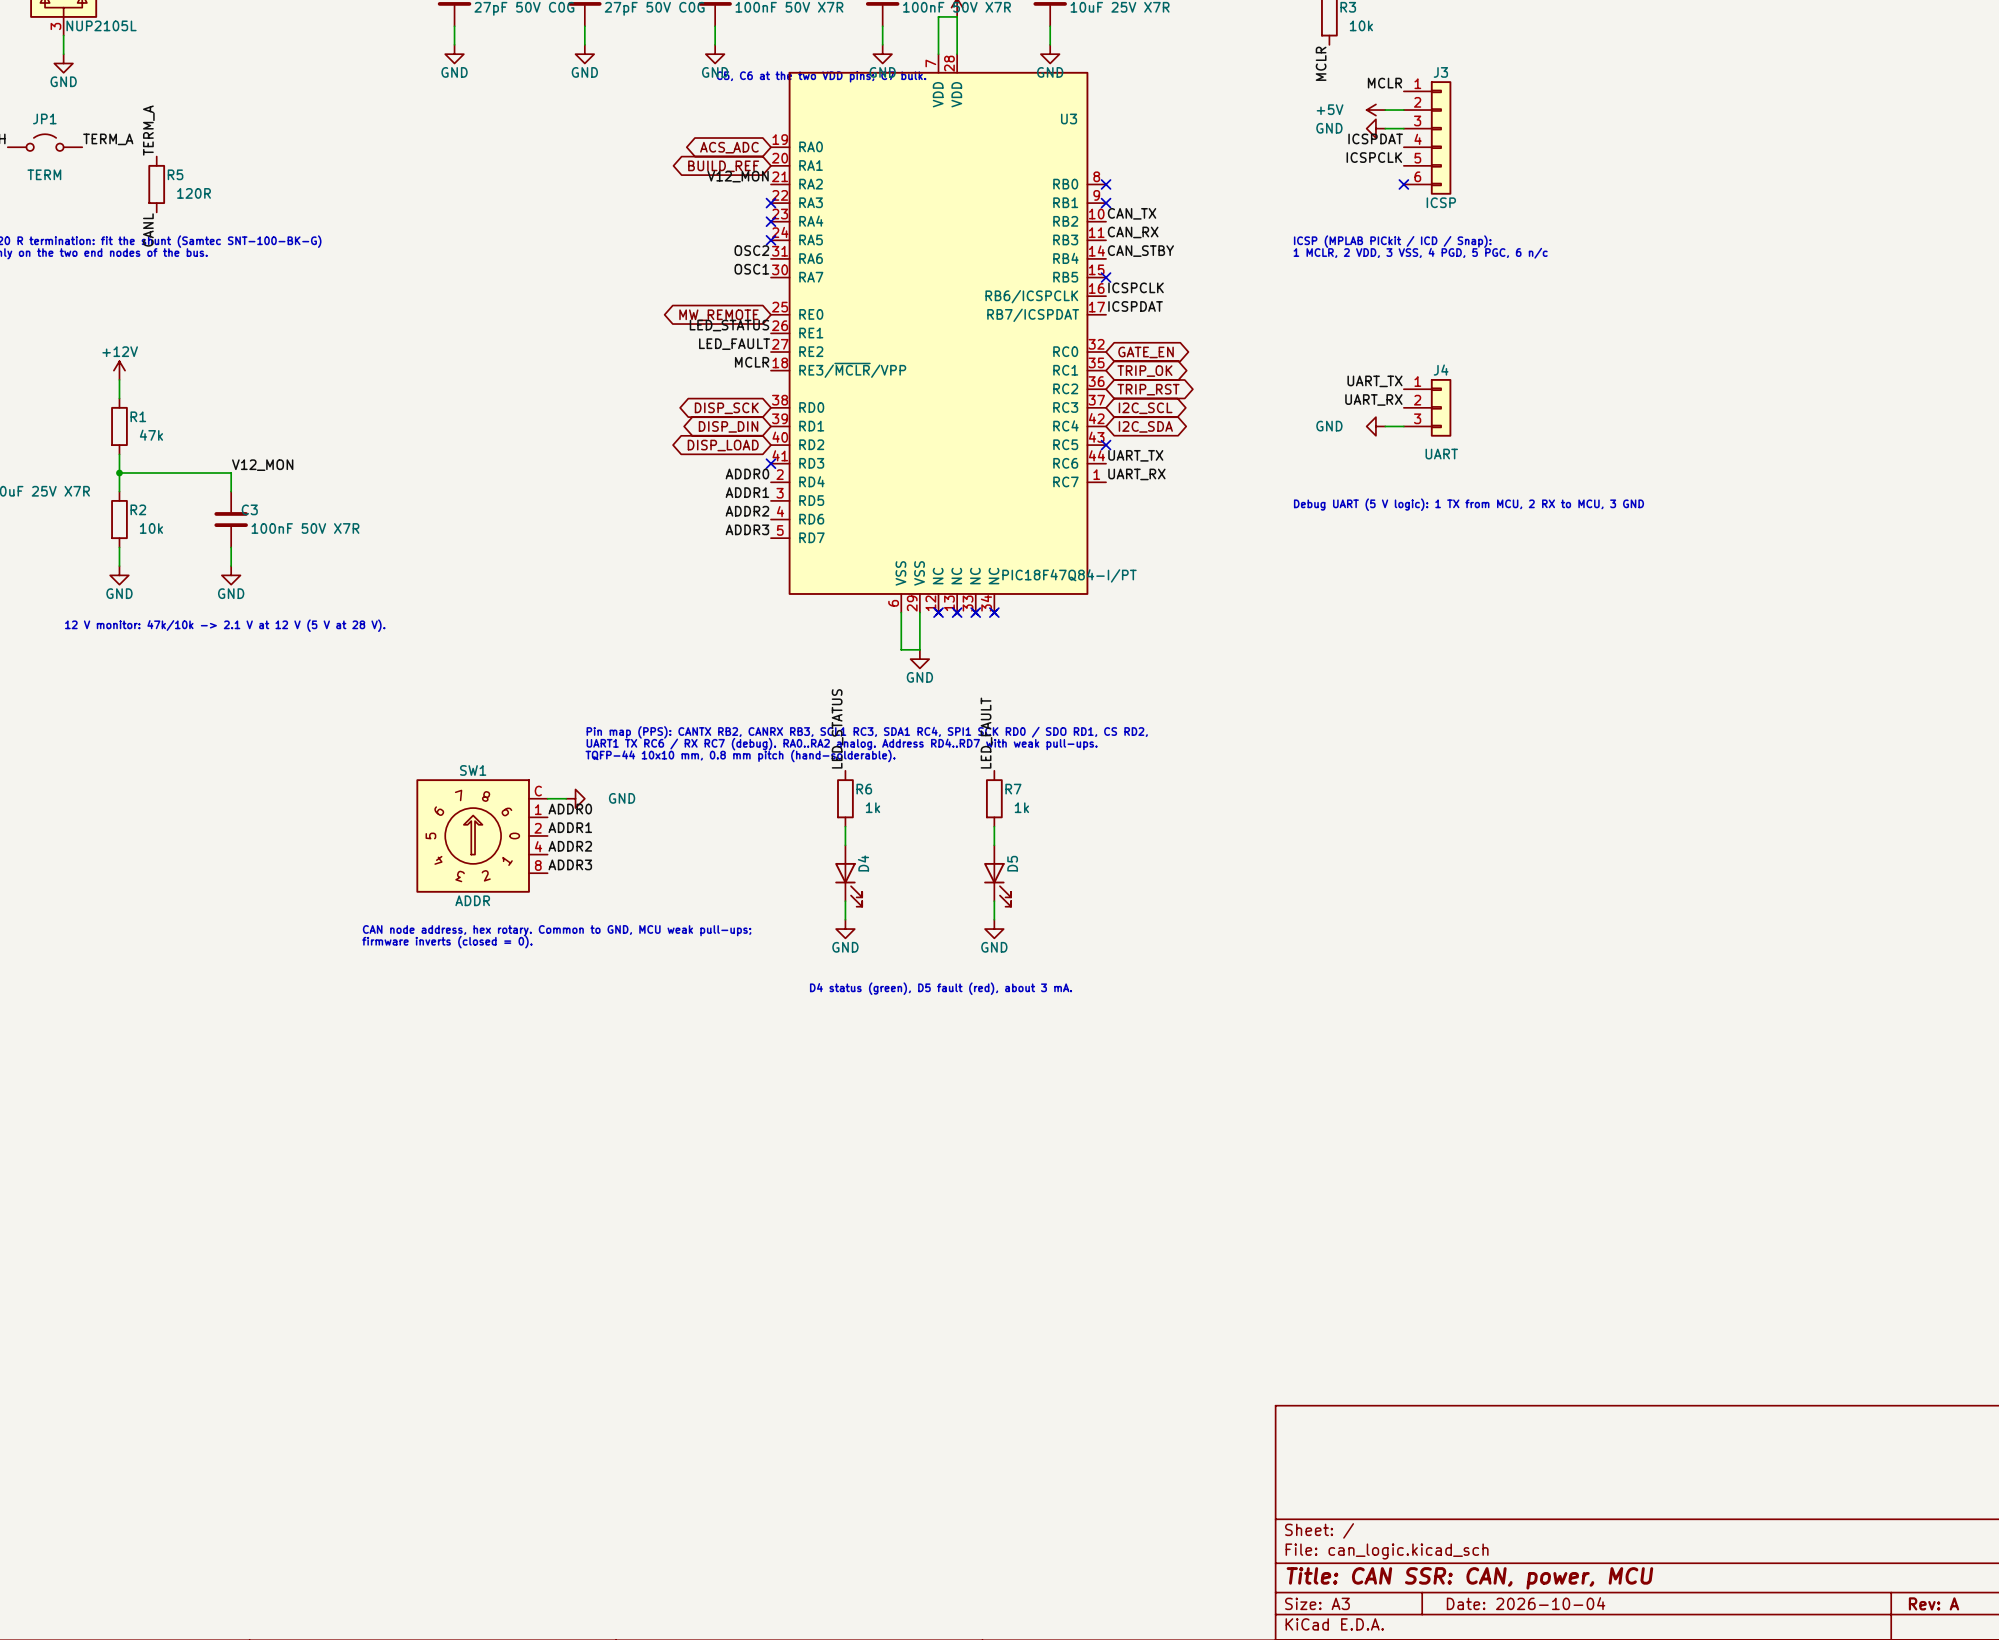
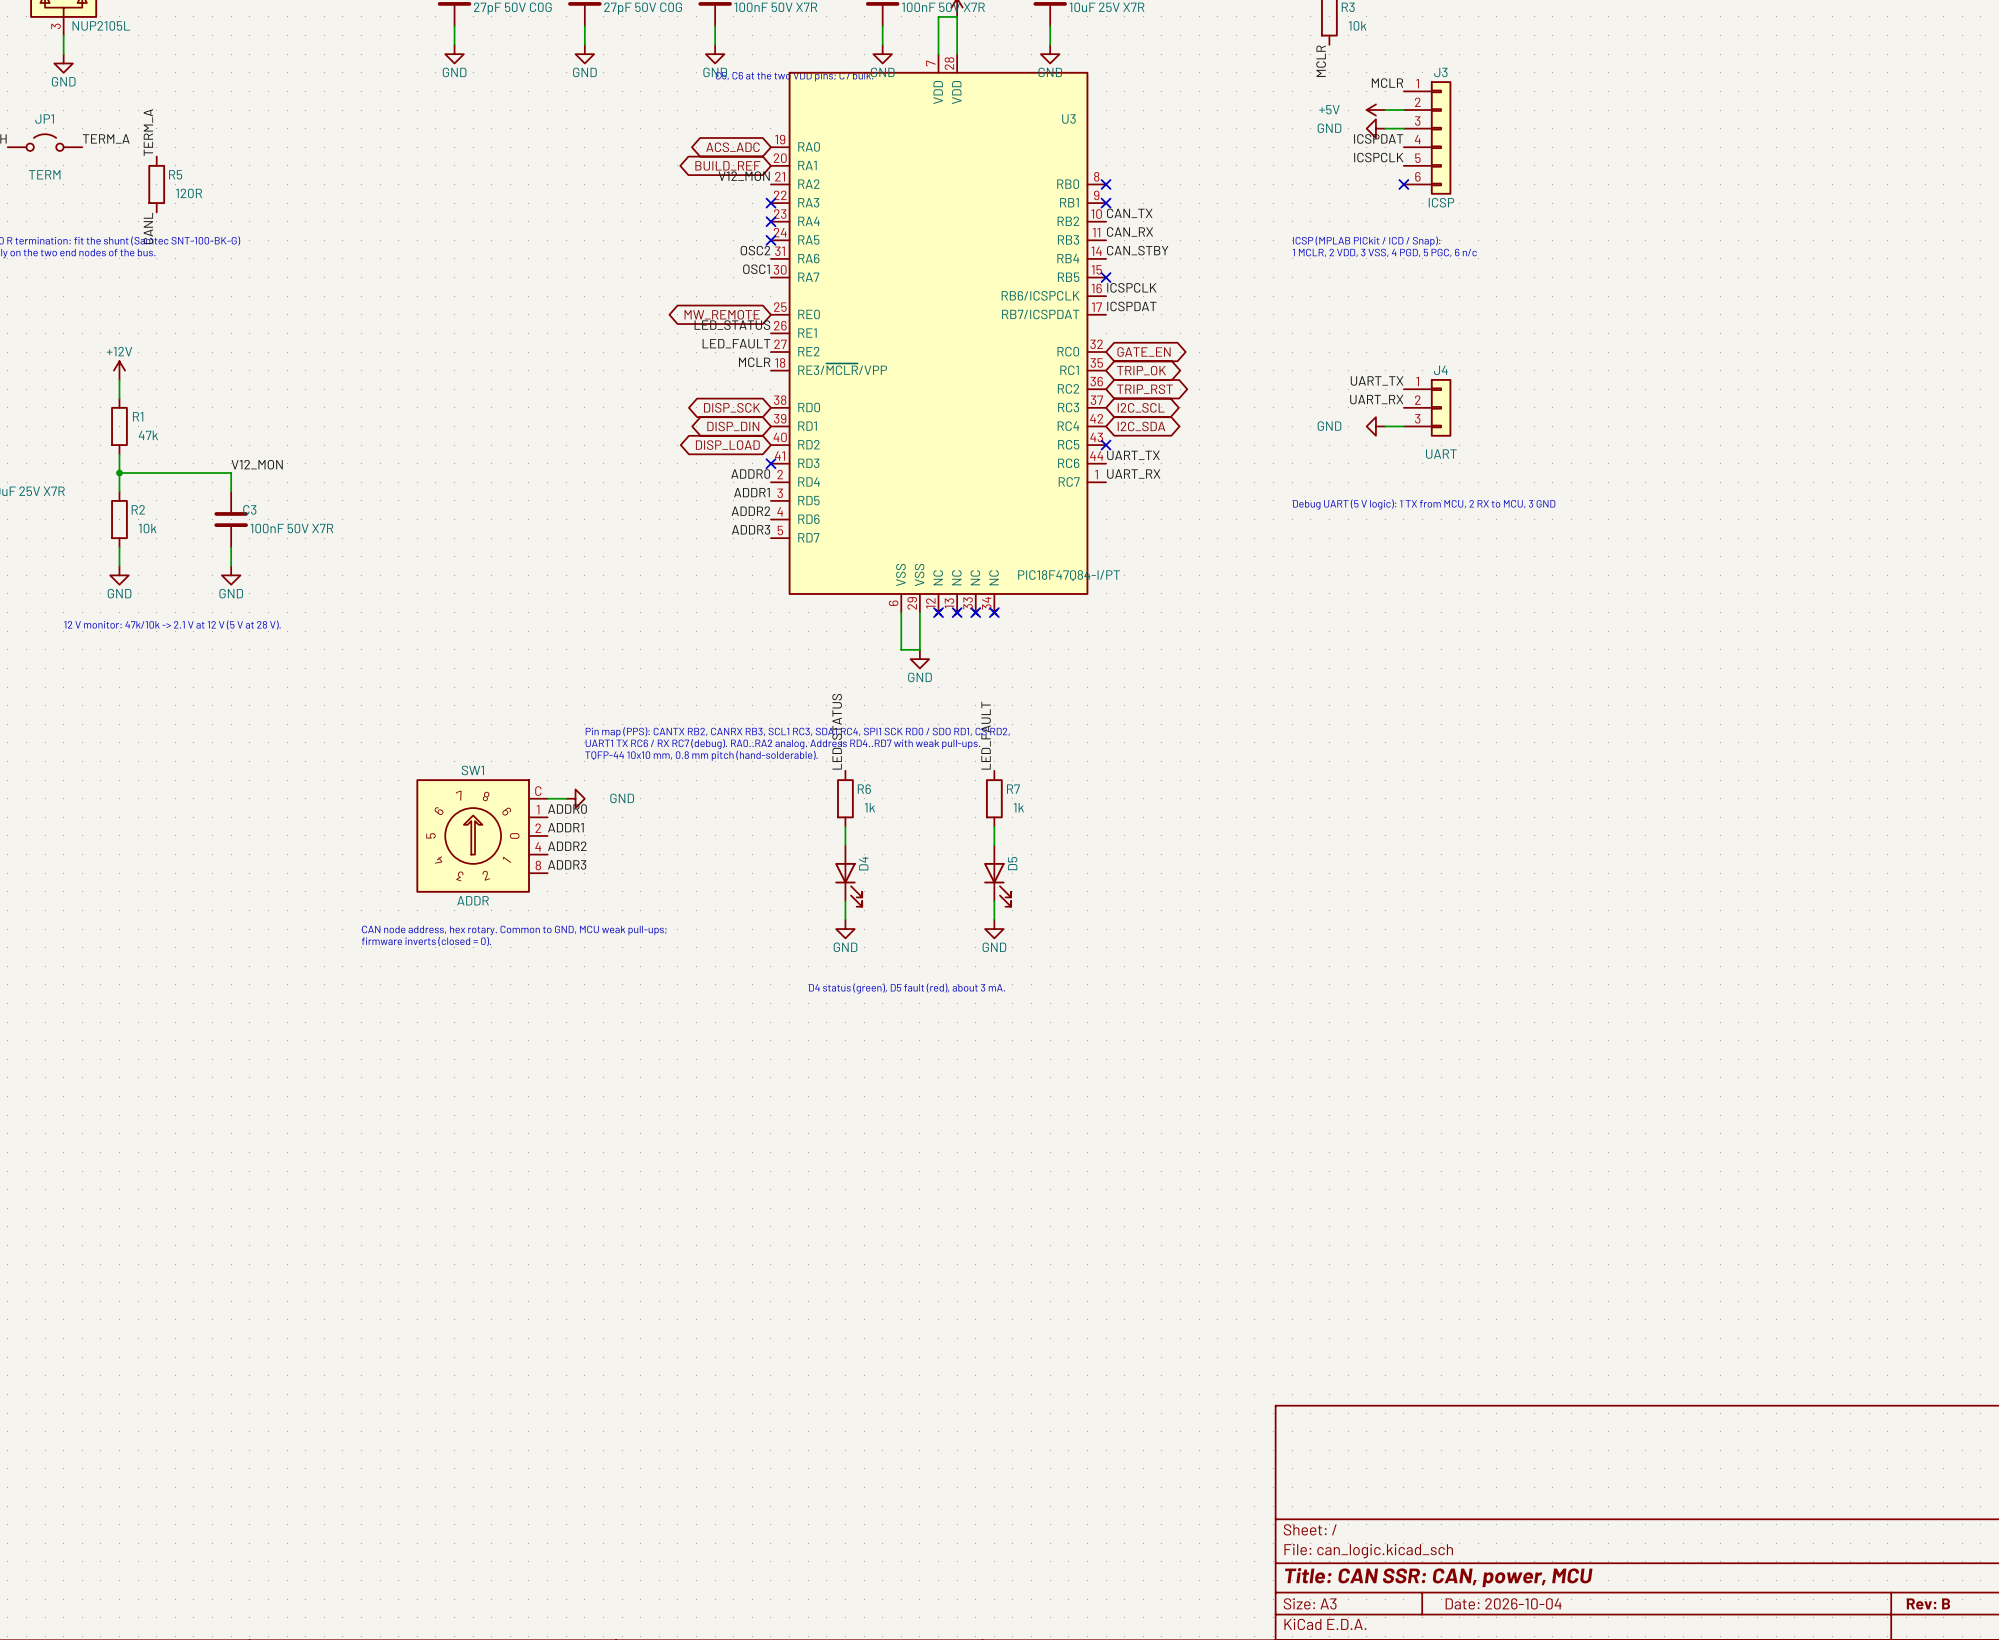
title block: Rev: A (1934, 1603) -> Rev: B (1928, 1603)

